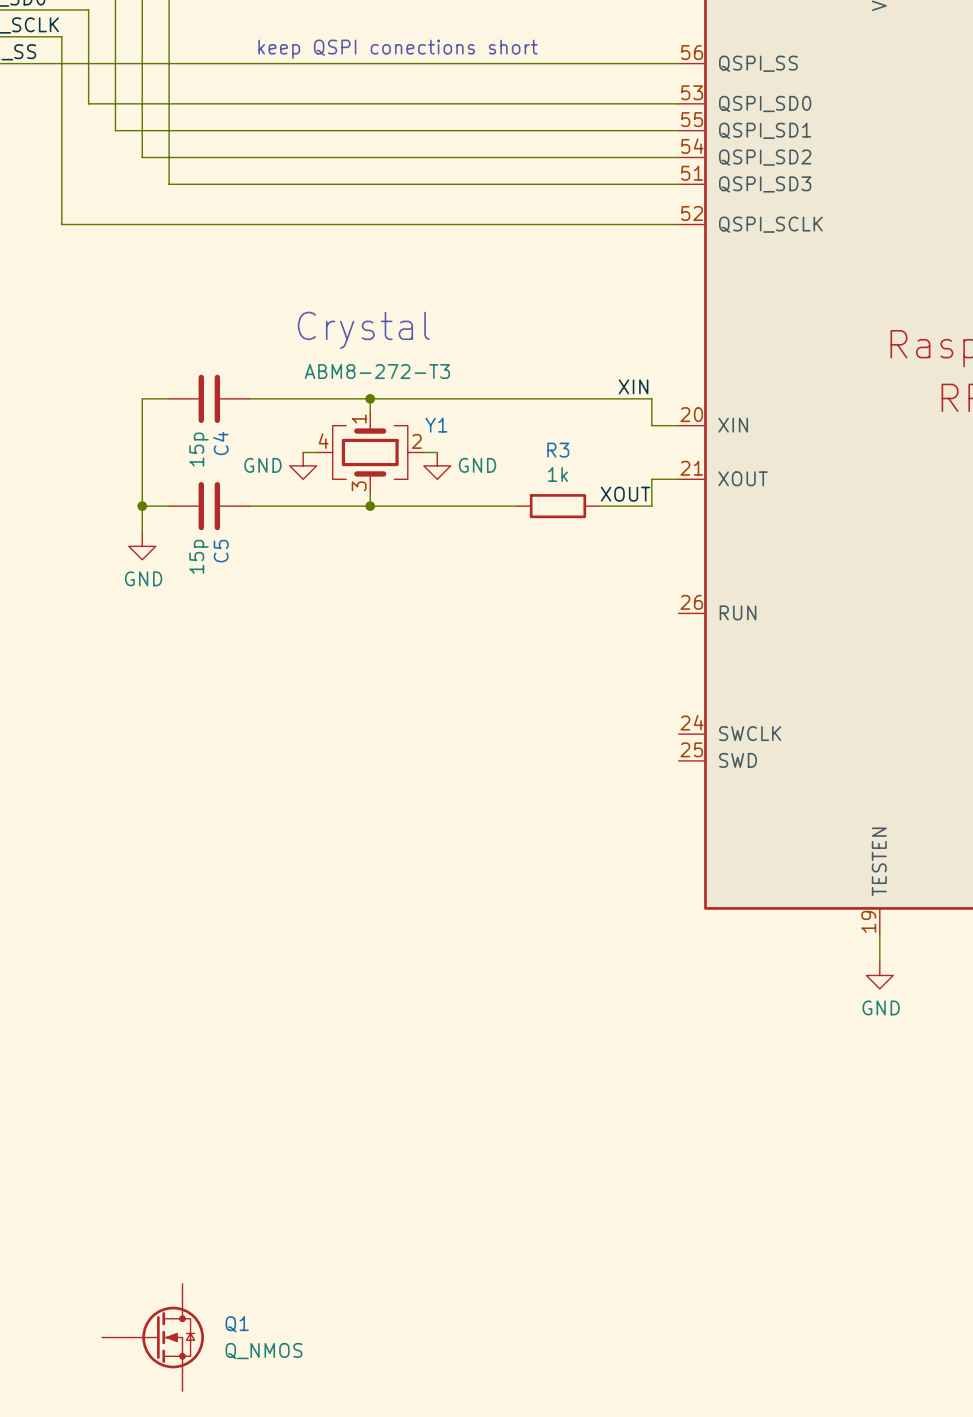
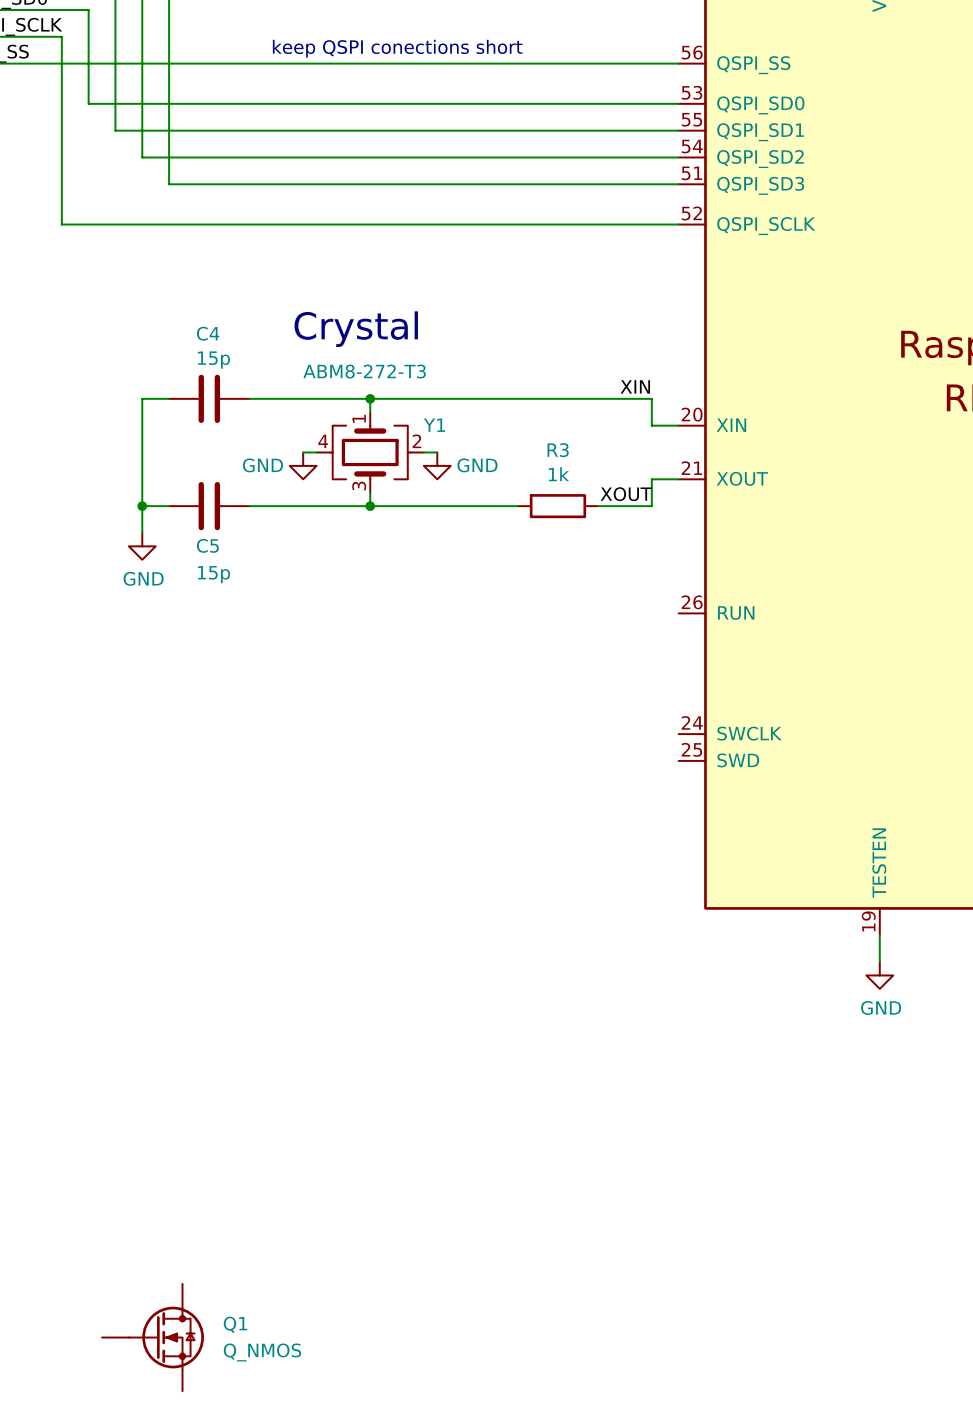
C4 name rotation: 0° (220, 443) -> 90° clockwise (208, 333)
C4 name position: C4 (220, 443) -> C4 (208, 333)
C4 value rotation: 0° (198, 449) -> 90° clockwise (213, 360)
C4 value position: 15p (198, 449) -> 15p (213, 360)
C5 name rotation: 0° (221, 551) -> 90° clockwise (207, 545)
C5 value rotation: 0° (198, 556) -> 90° clockwise (213, 574)

